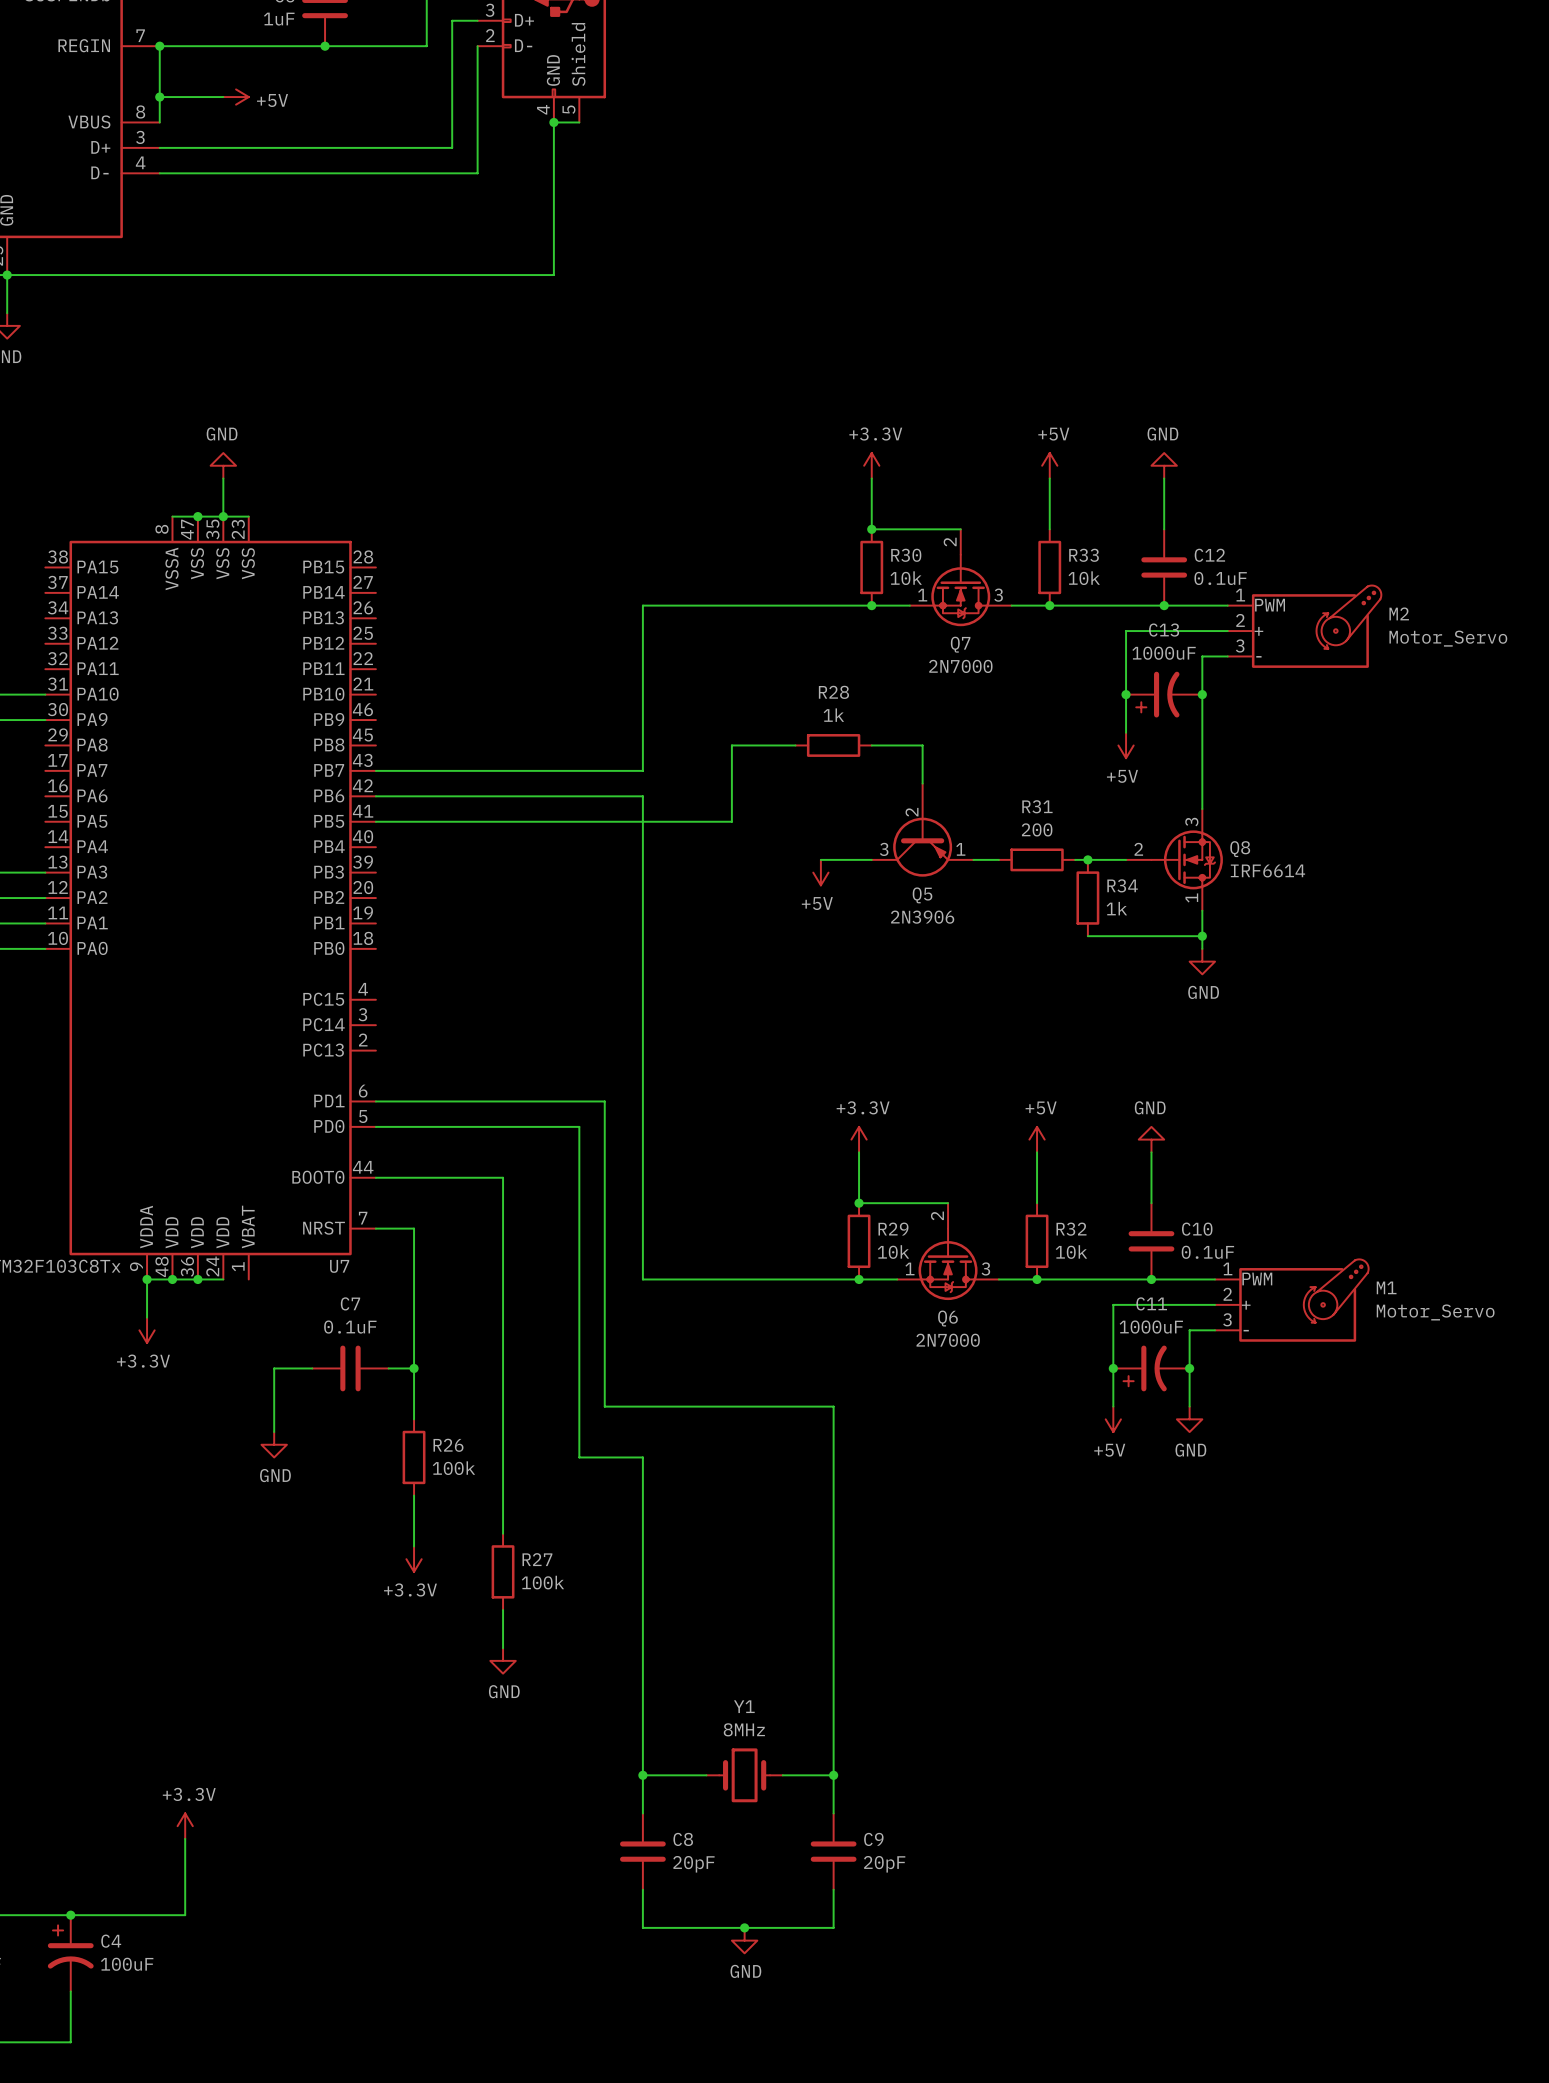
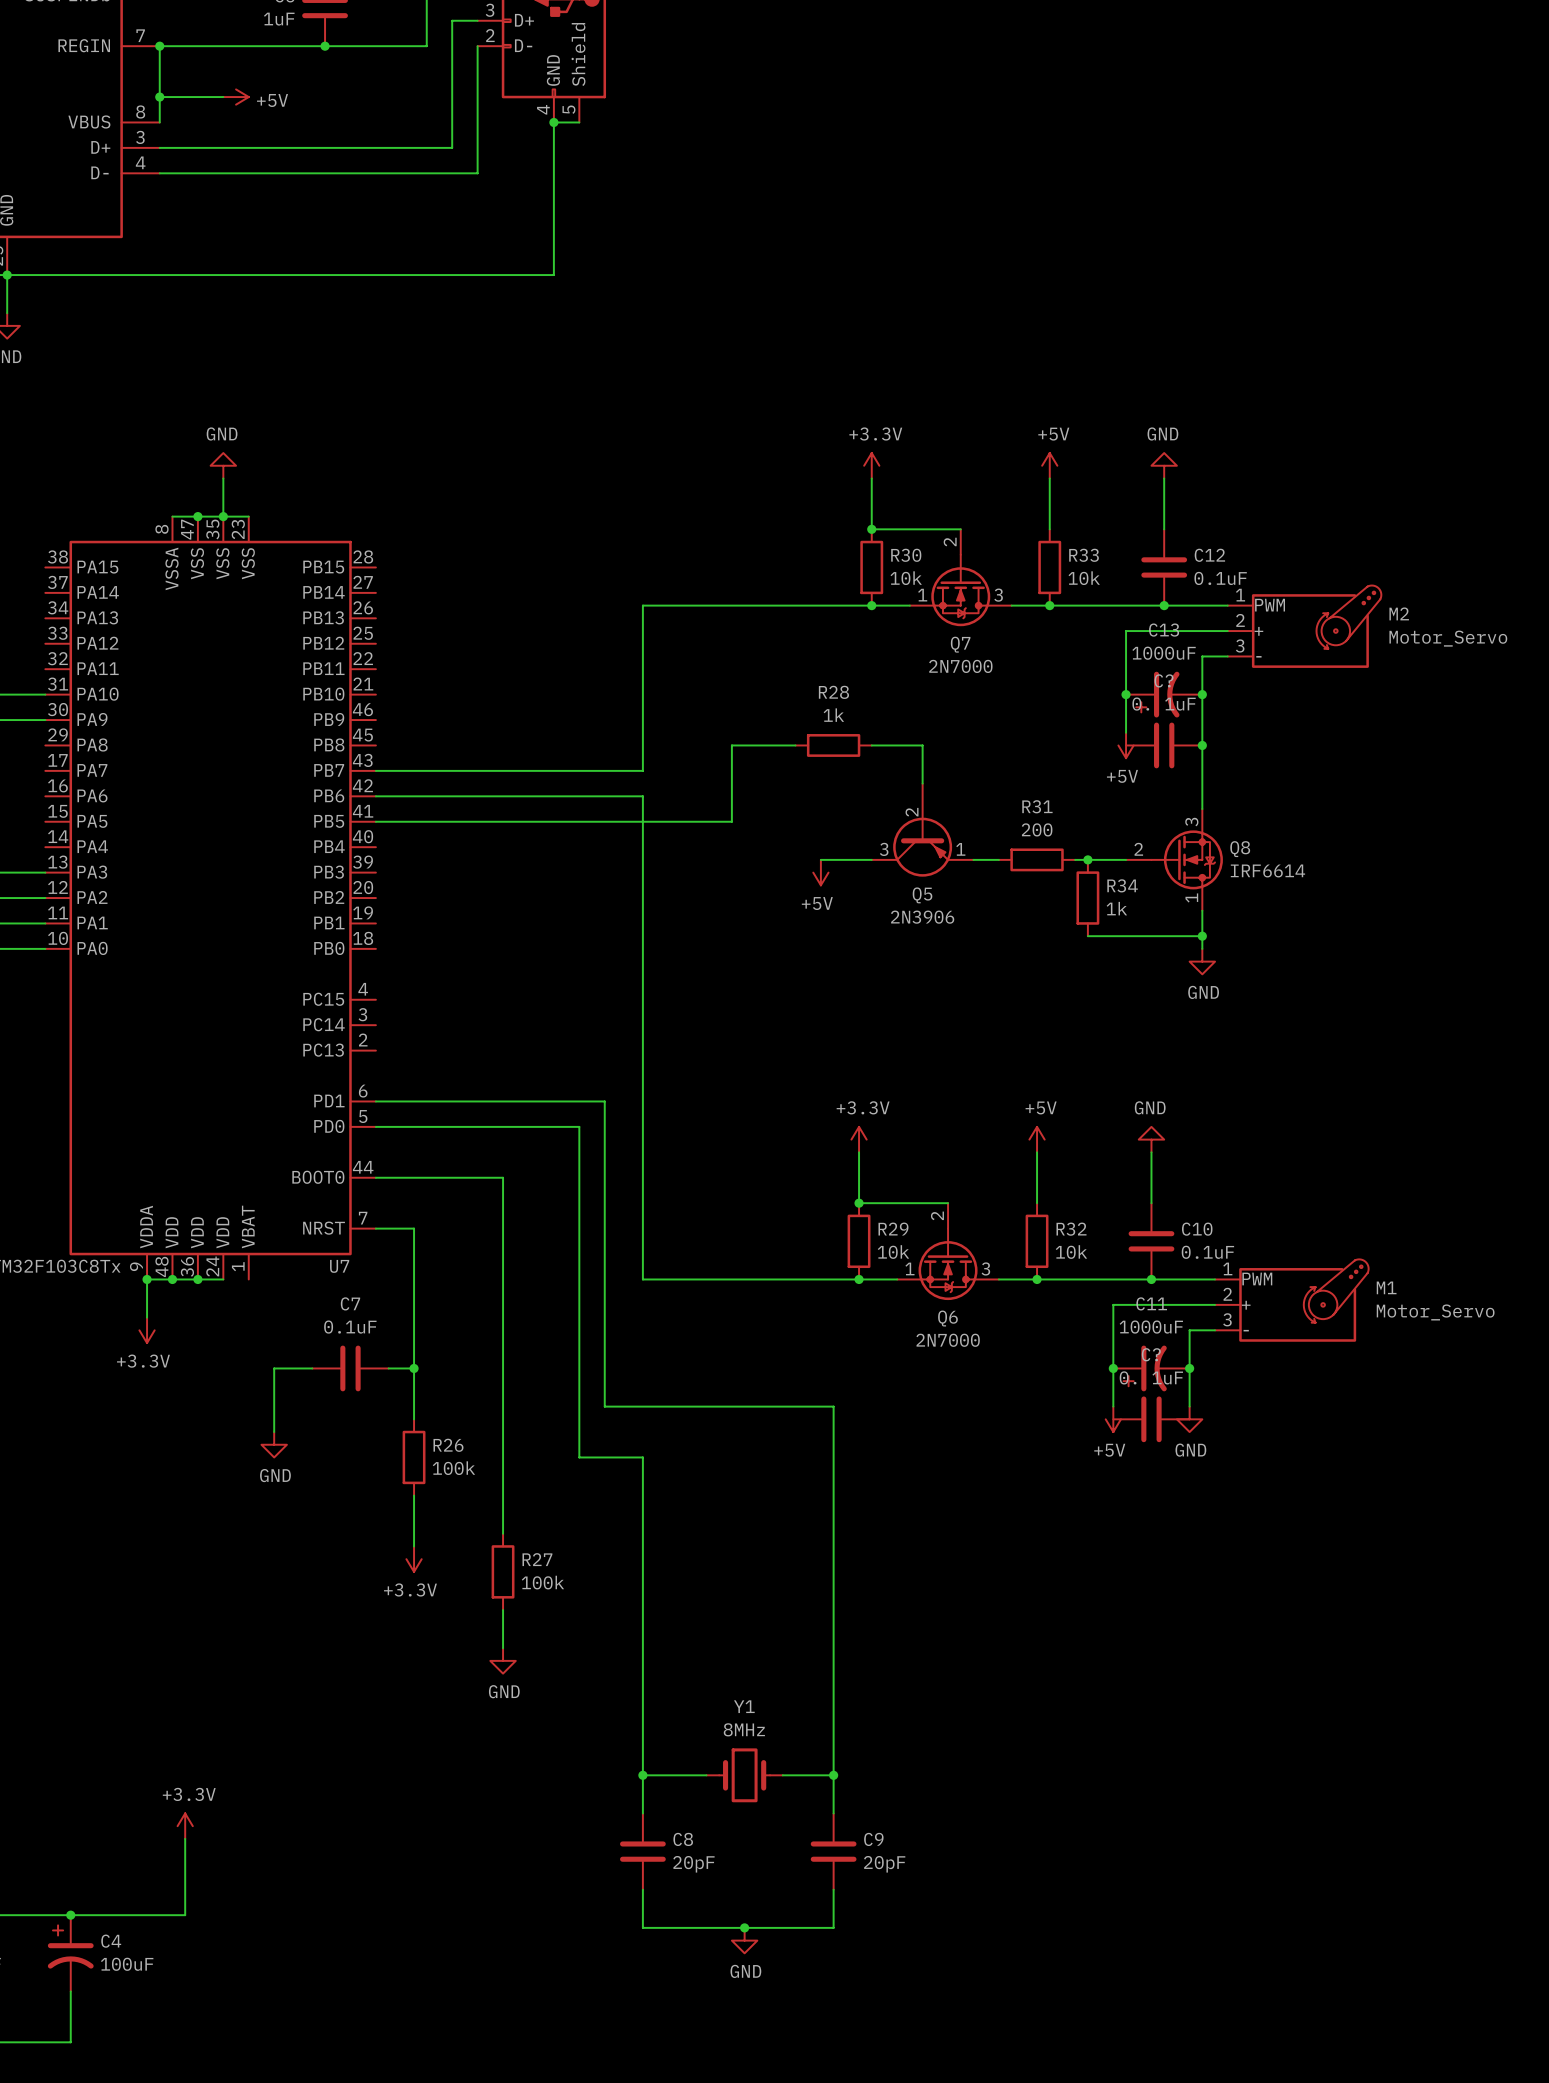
C?: none -> 0. 1uF (1164, 745)
junction: none -> (1202, 745)
C?: none -> 0. 1uF (1151, 1419)

